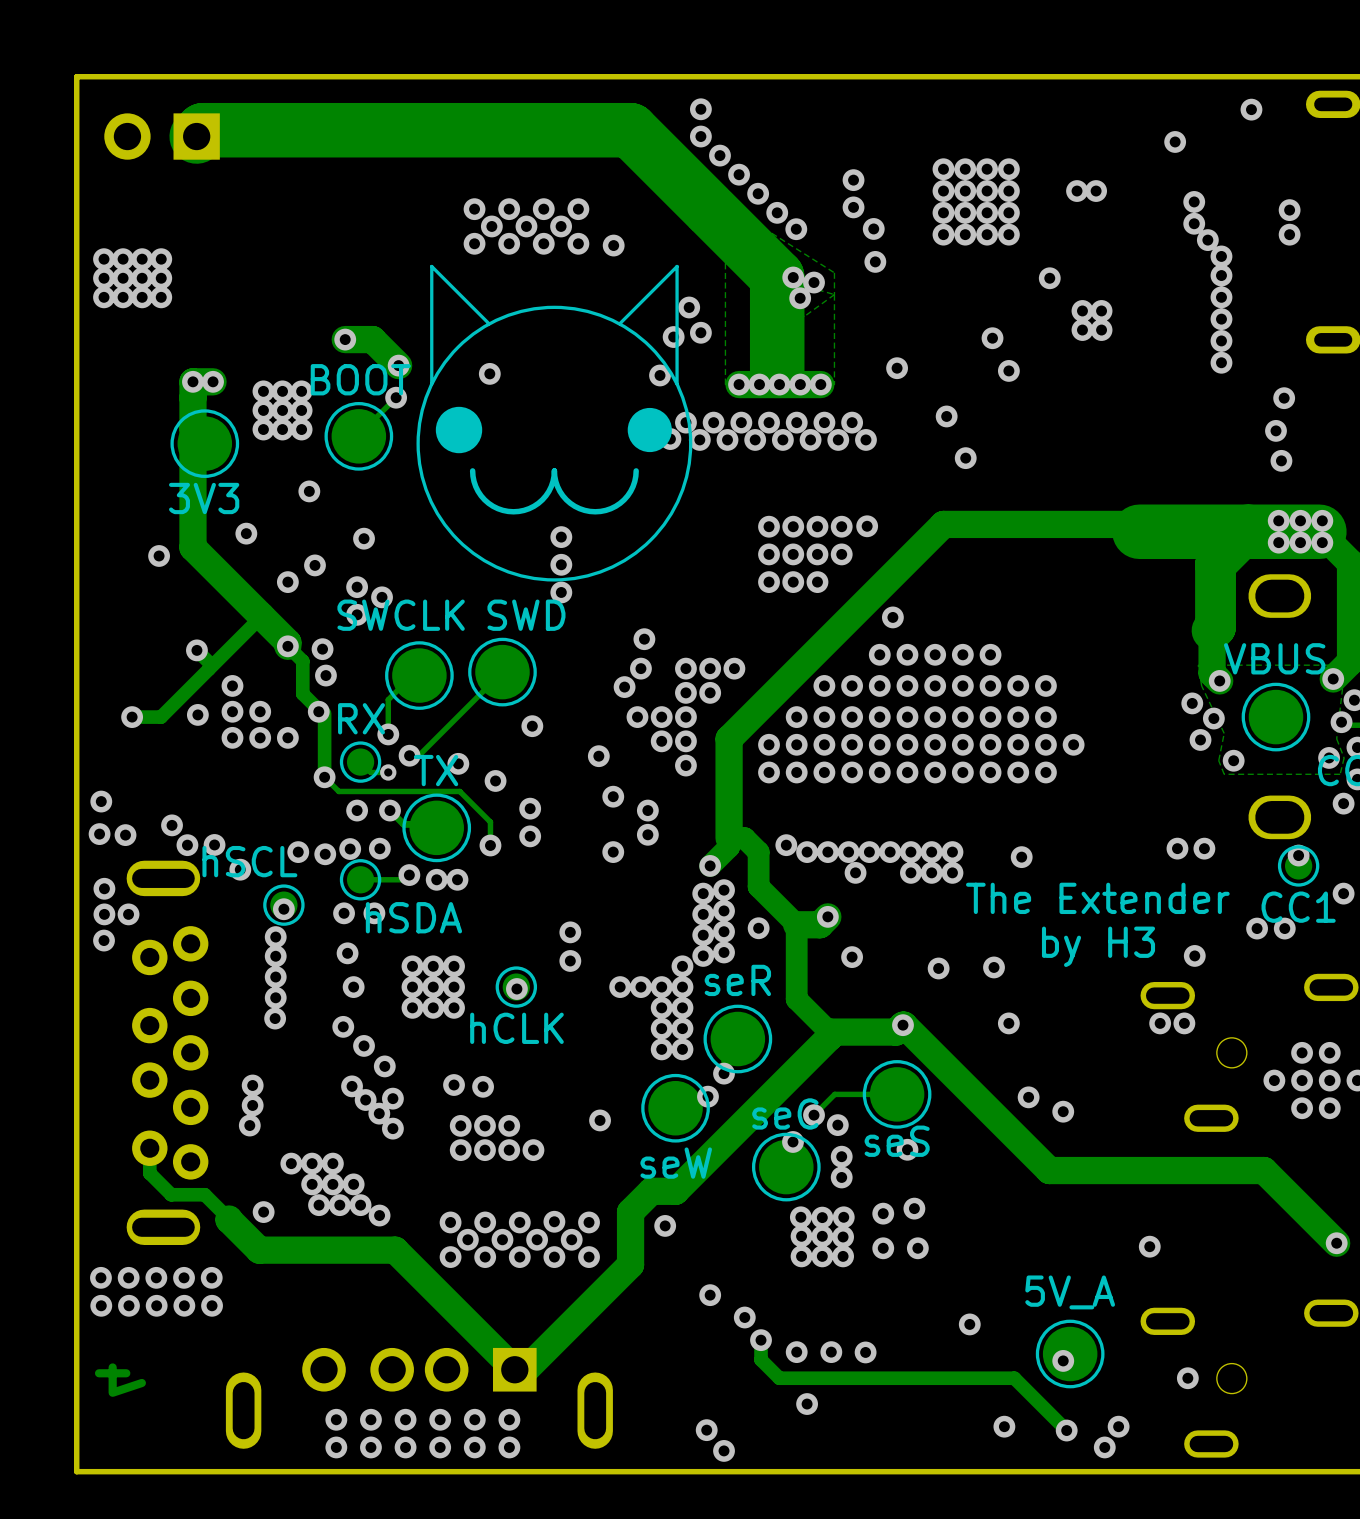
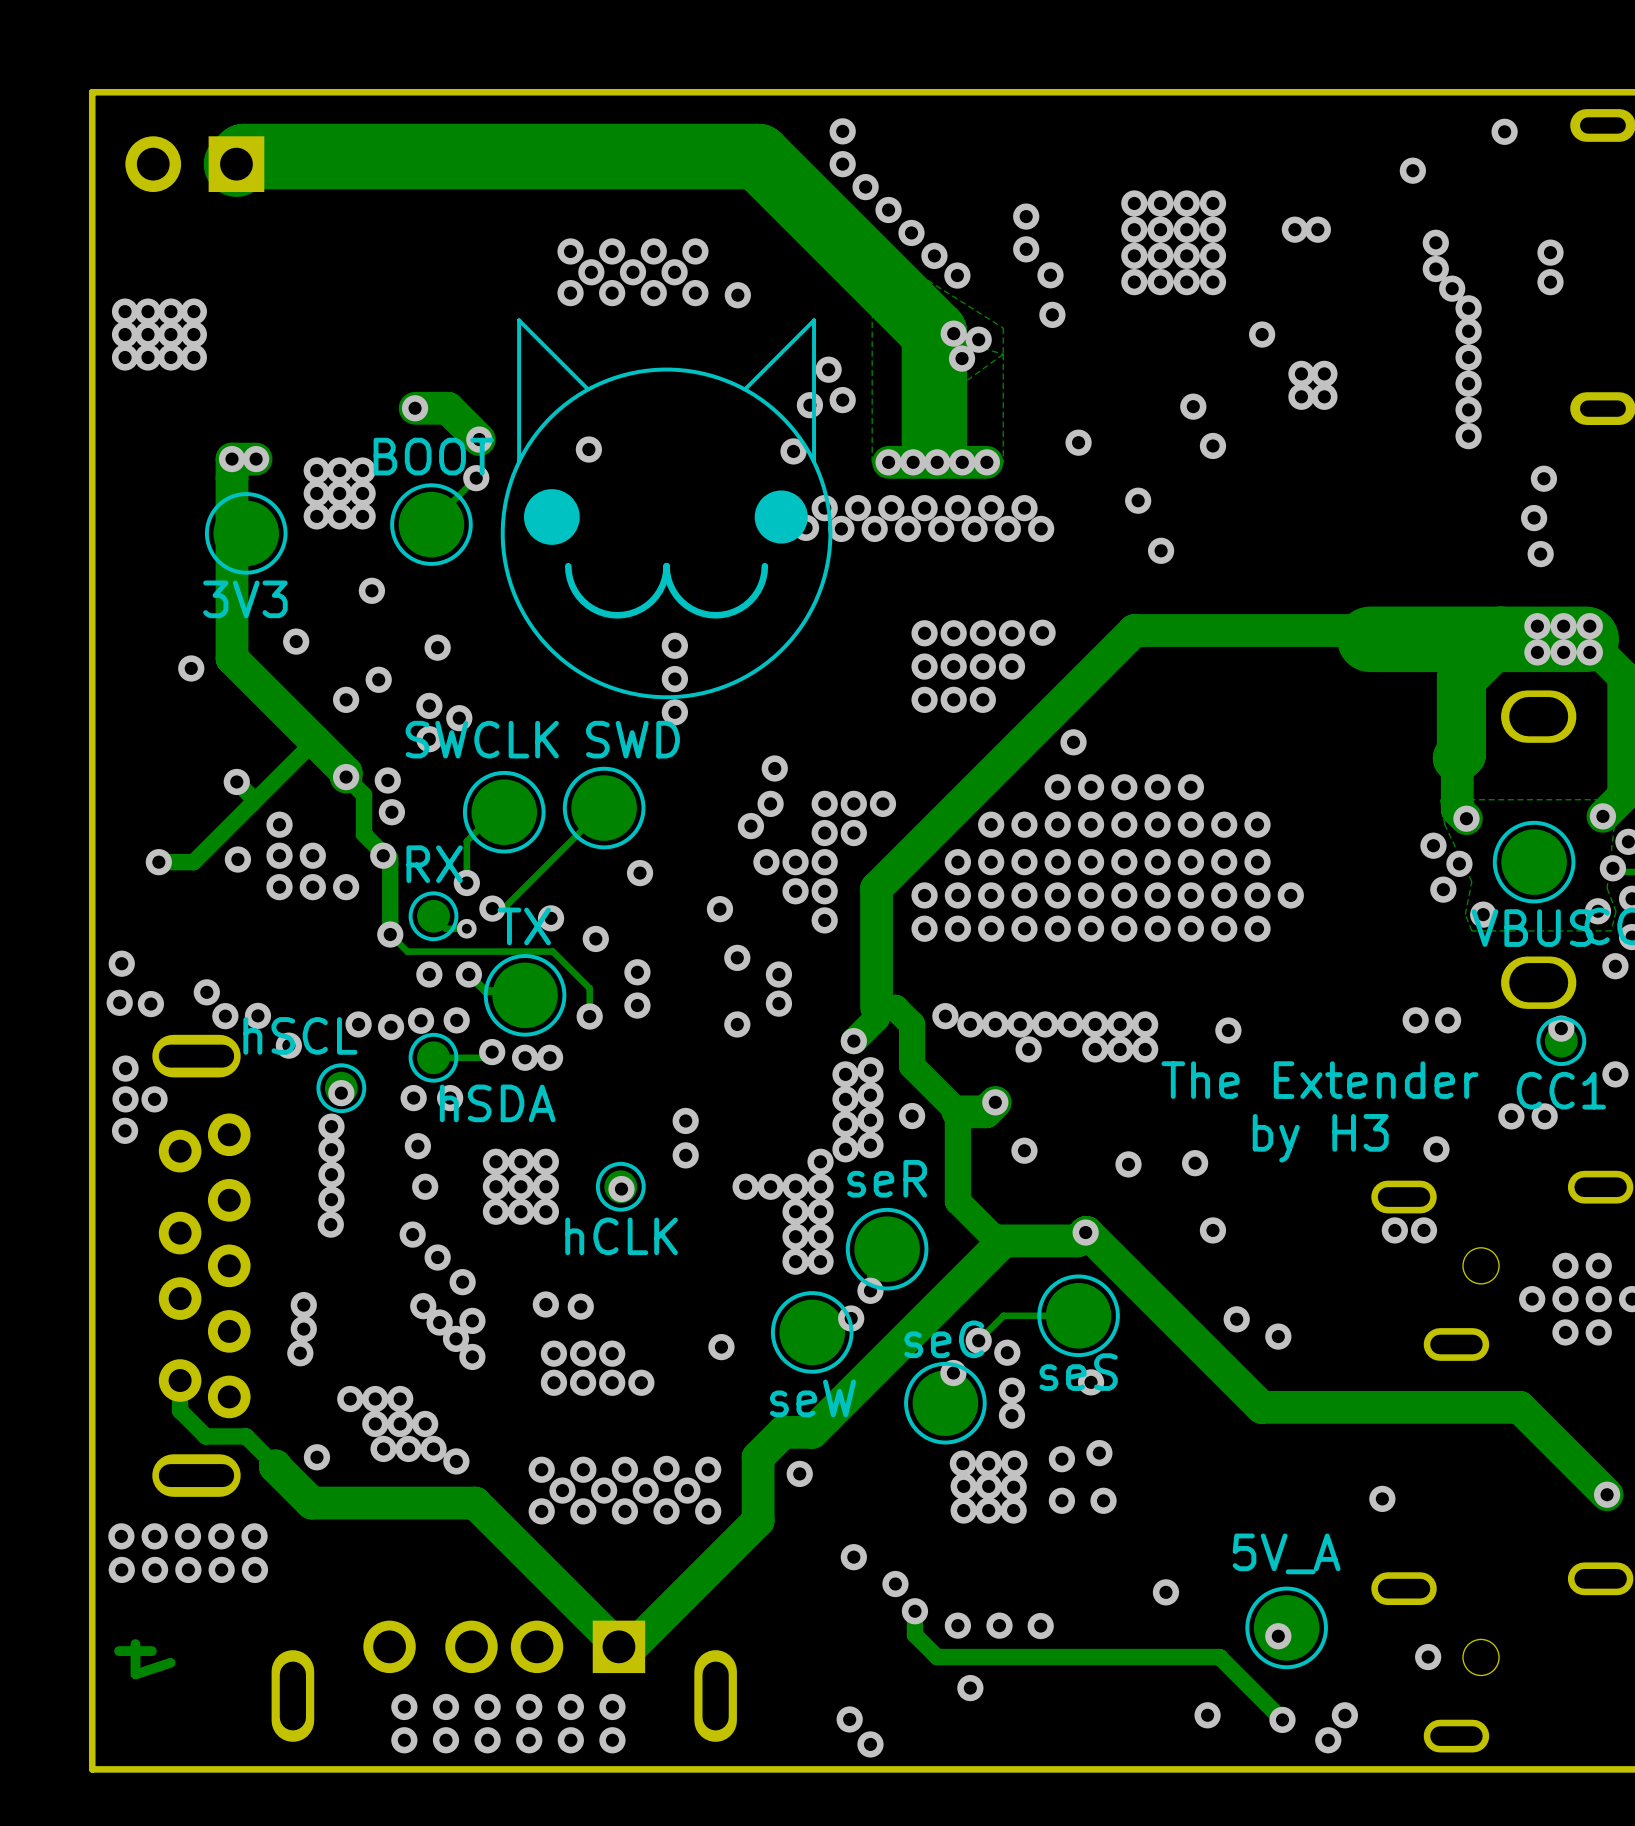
part value position: VBUS (1274, 658) -> VBUS (1532, 928)

